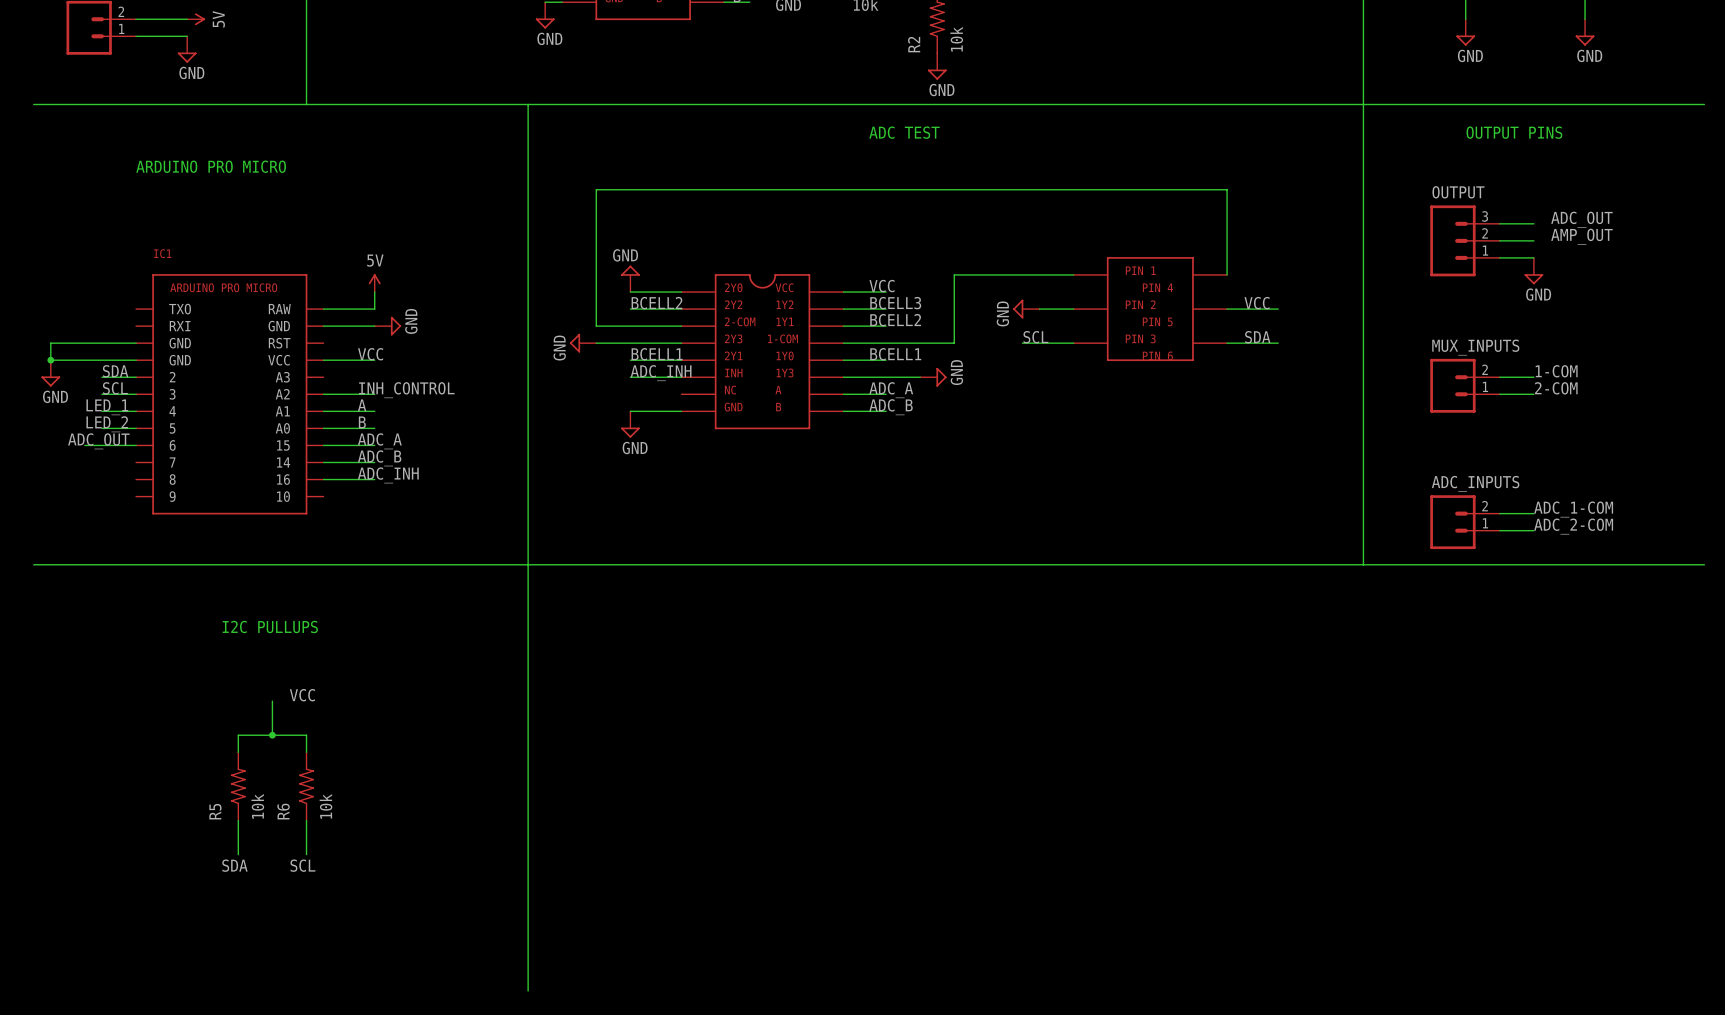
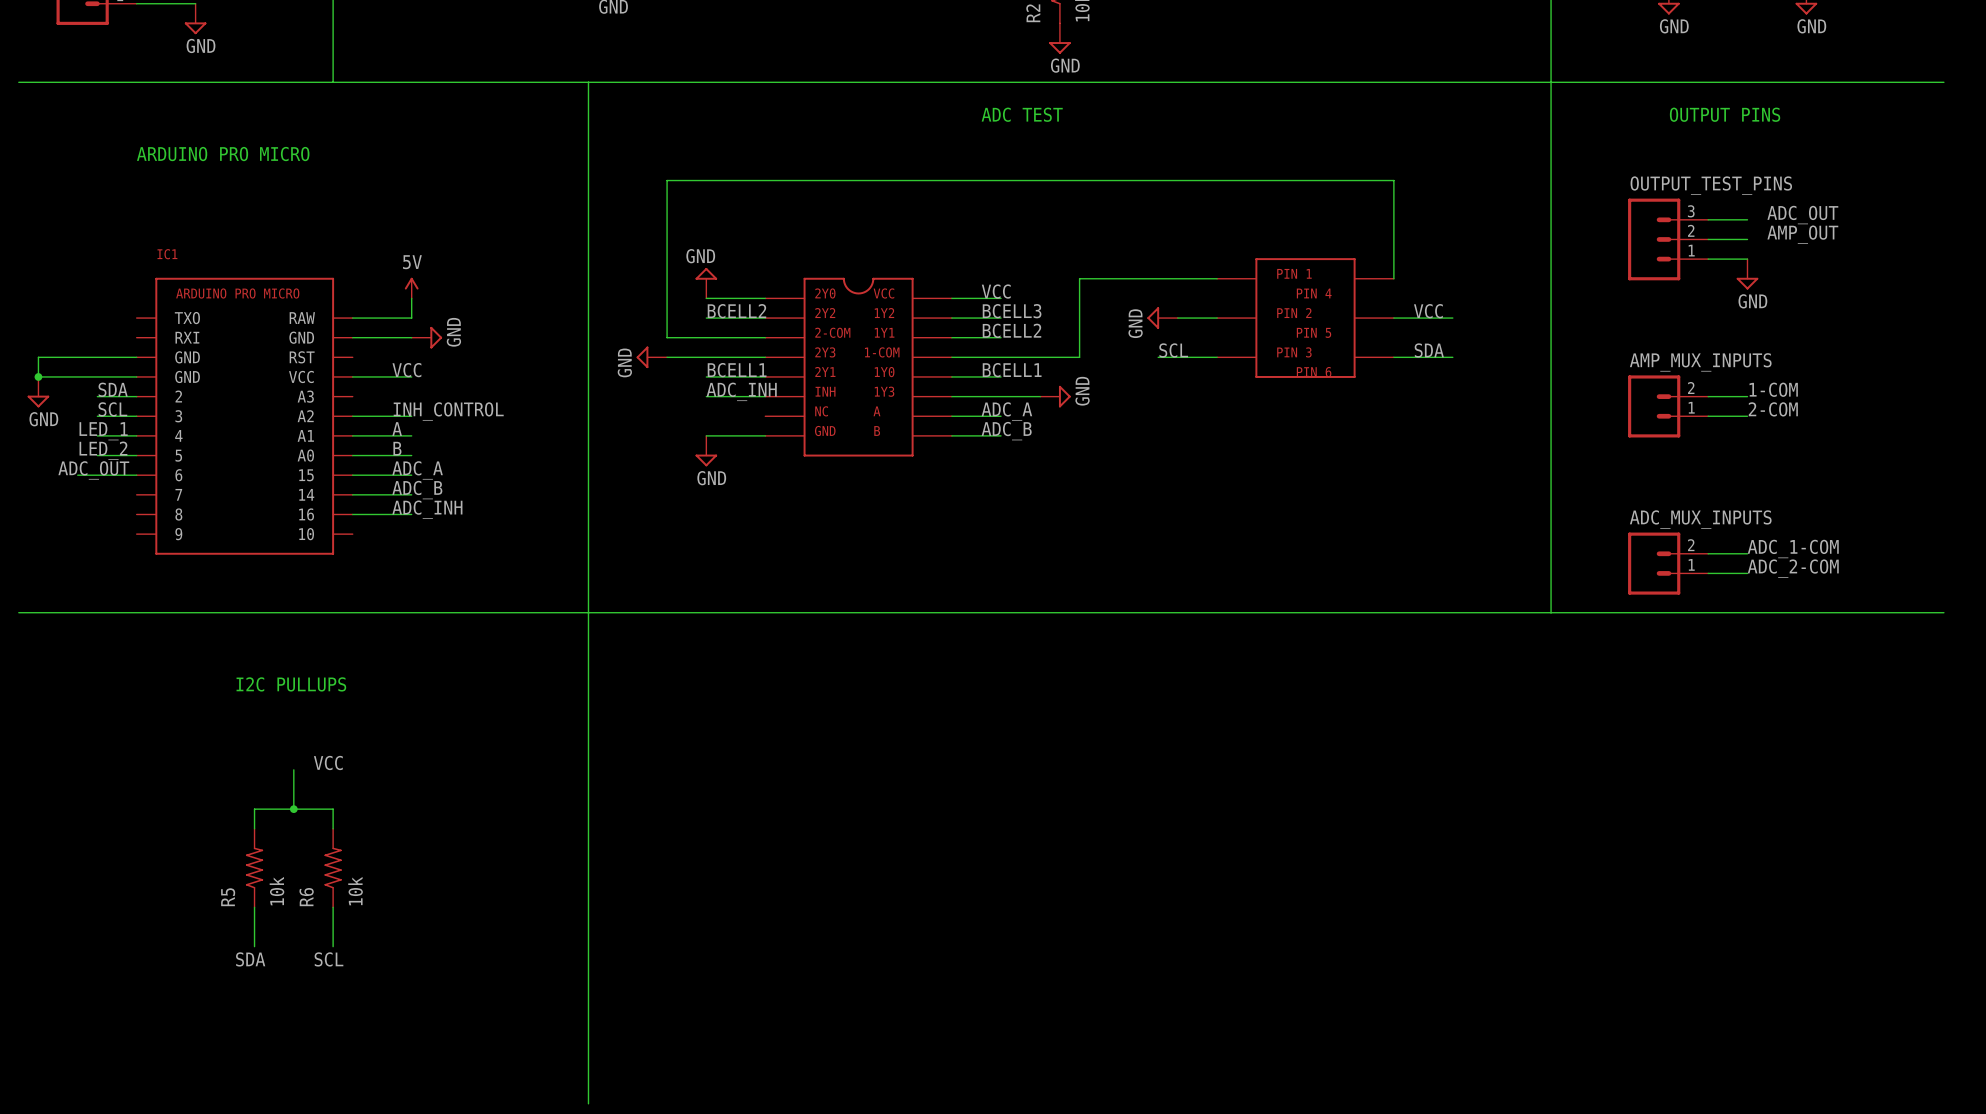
OUTPUT name: OUTPUT (1458, 192) -> OUTPUT_TEST_PINS (1711, 185)
MUX_INPUTS name: MUX_INPUTS (1475, 347) -> AMP_MUX_INPUTS (1700, 362)
ADC_INPUTS name: ADC_INPUTS (1475, 483) -> ADC_MUX_INPUTS (1700, 519)

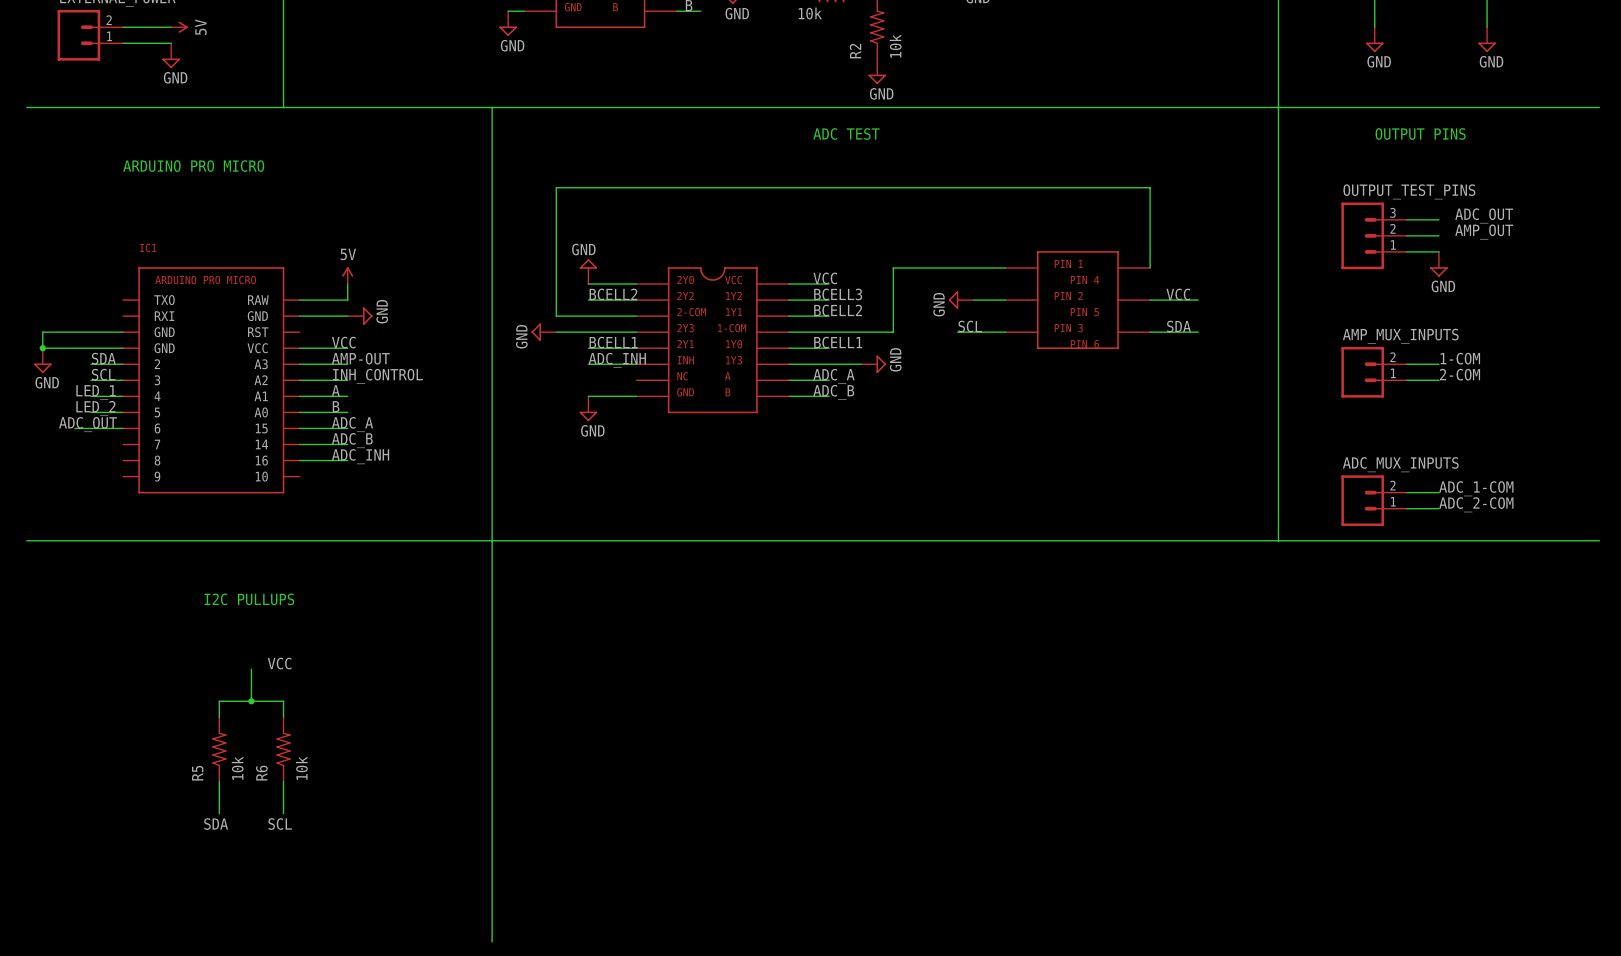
label: none -> AMP-OUT (360, 358)
wire: none -> (299, 364) (347, 364)

